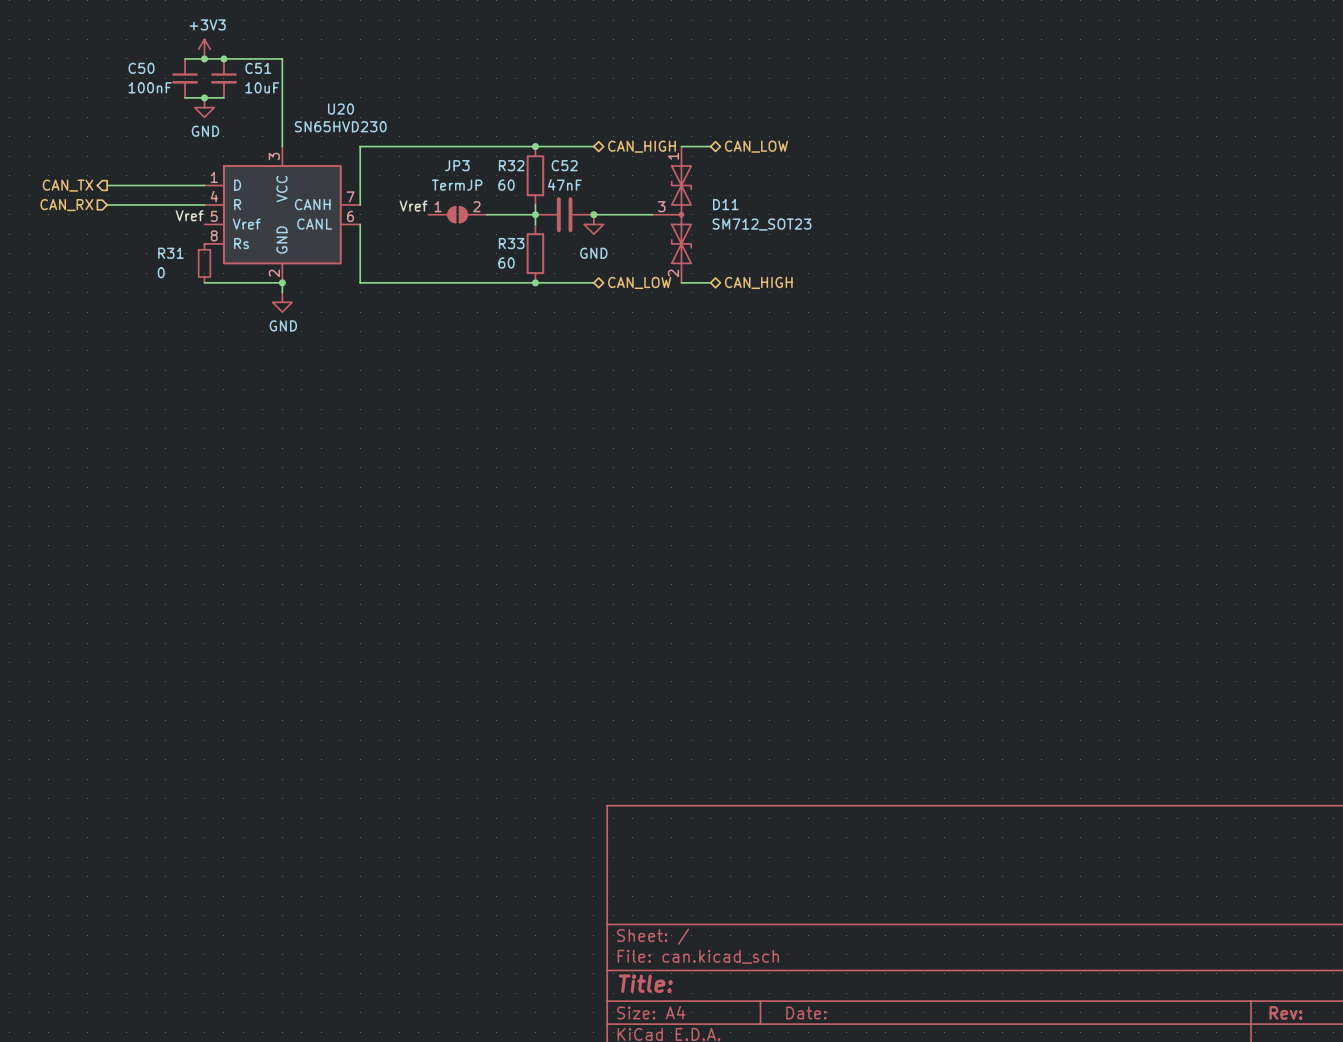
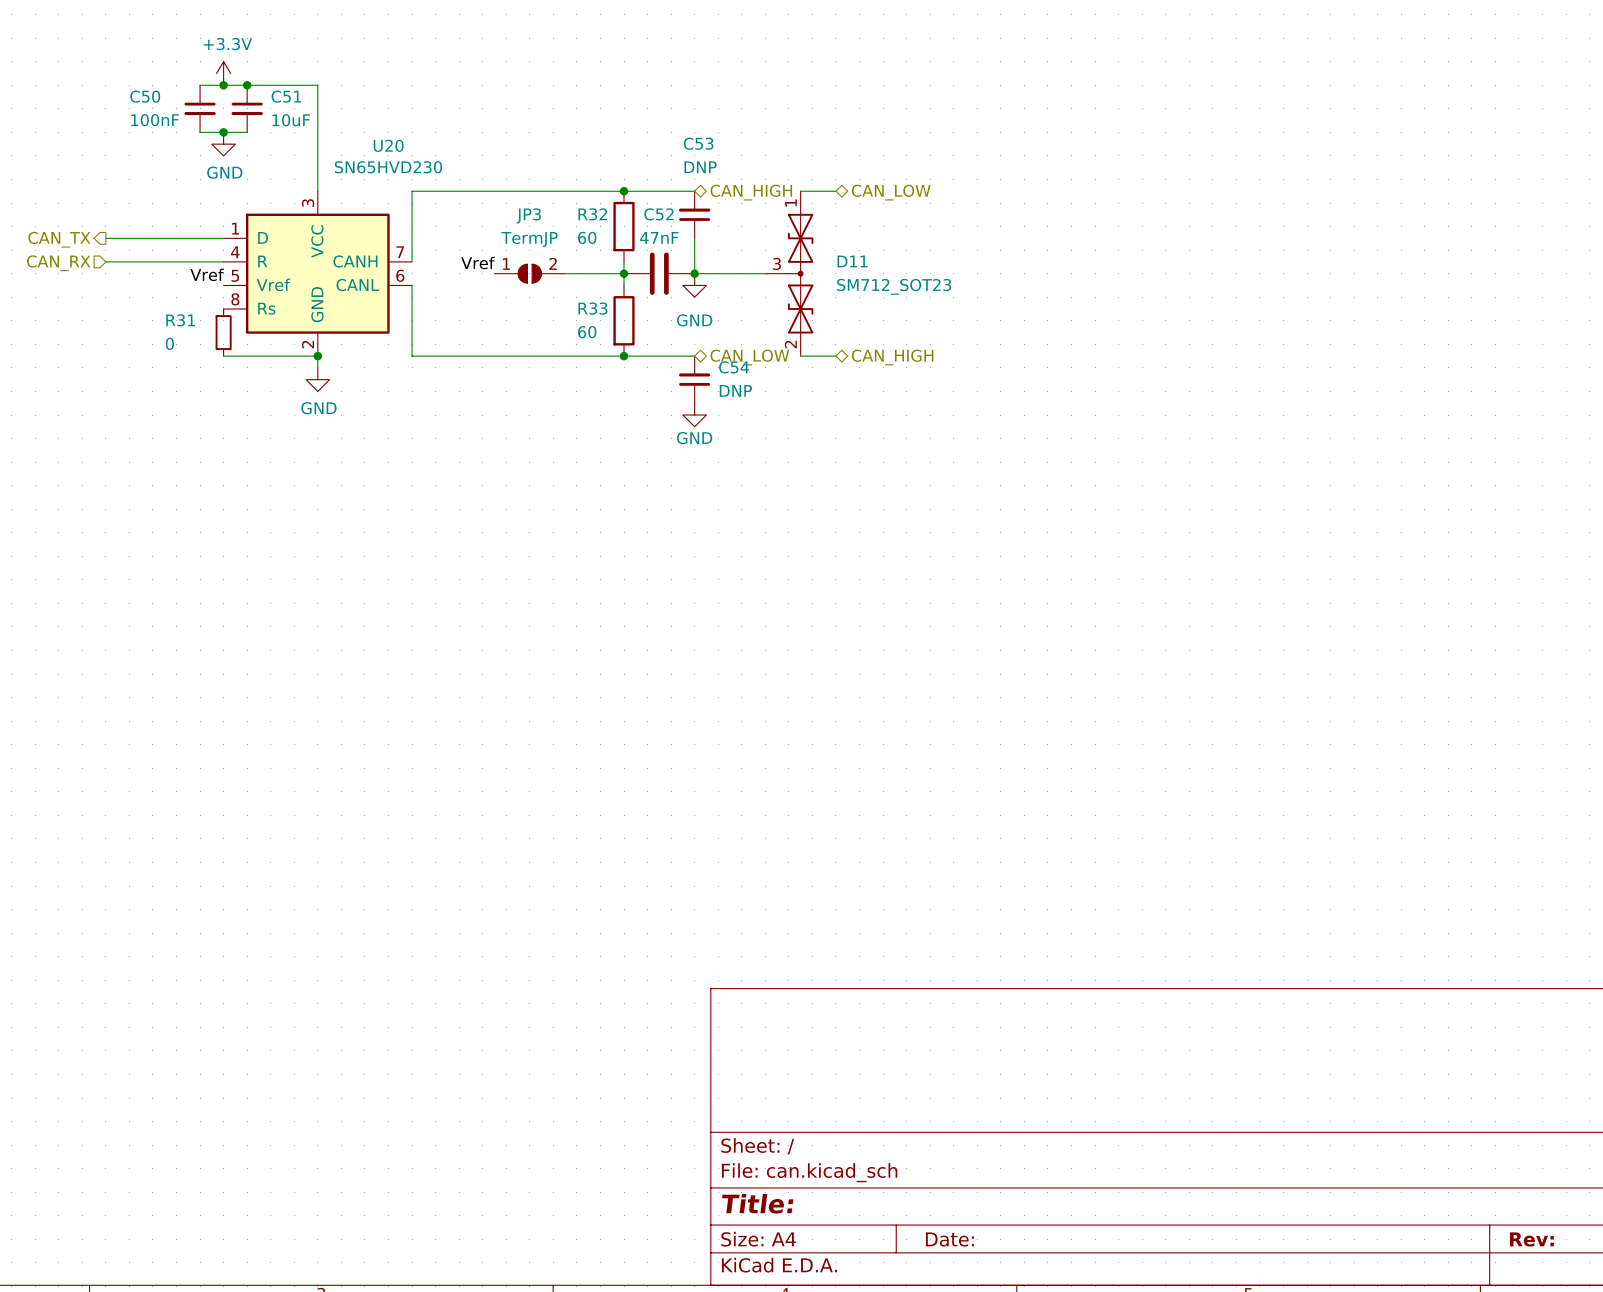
power symbol: +3V3 (204, 49) -> +3.3V (223, 73)
C53: none -> DNP (694, 214)
wire: none -> (694, 238) (694, 273)
C54: none -> DNP (694, 379)
power symbol: none -> GND (694, 415)

